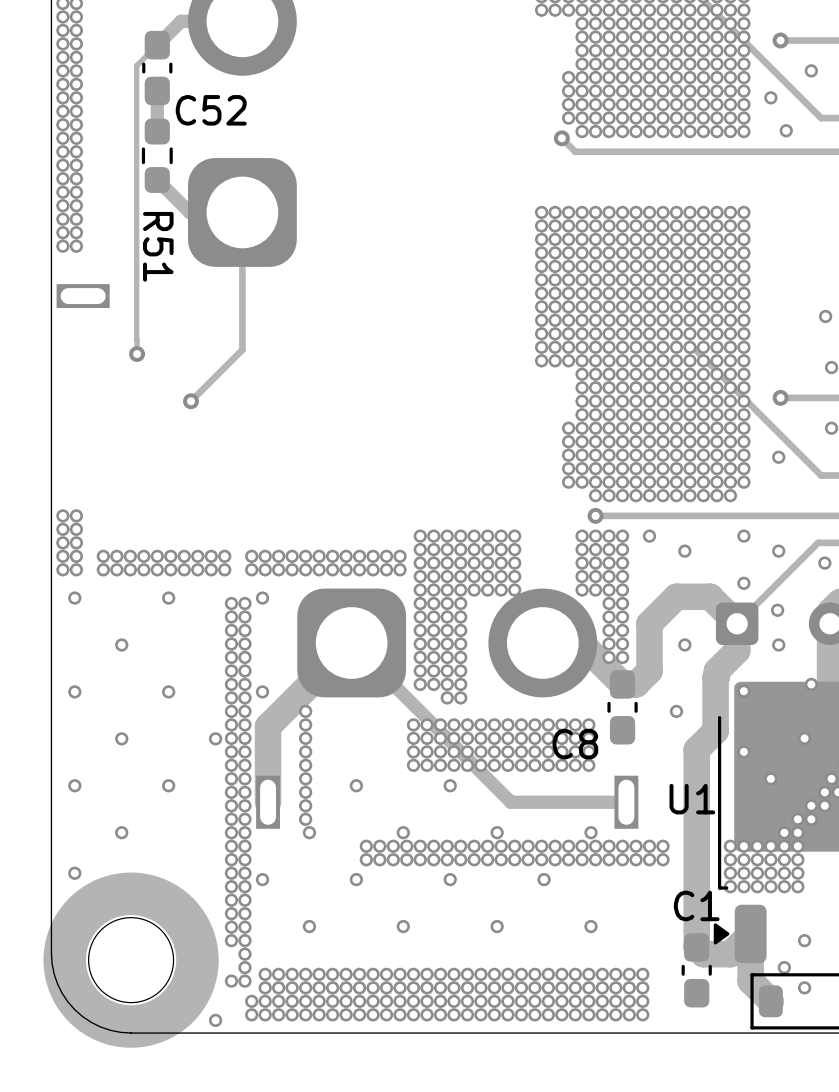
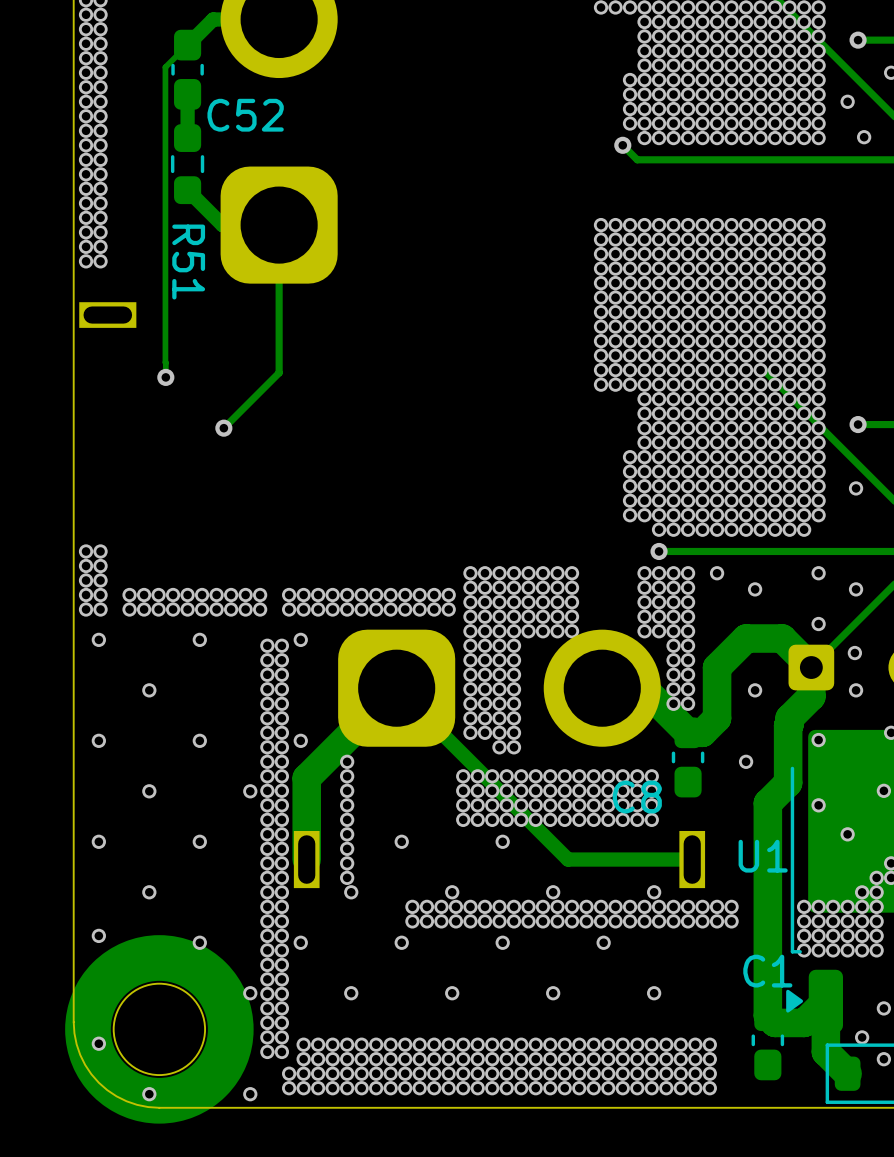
via: none -> (199, 942)
via: none -> (250, 993)
via: none -> (267, 1022)
via: none -> (267, 1037)
via: none -> (98, 1043)
via: none -> (149, 1094)

